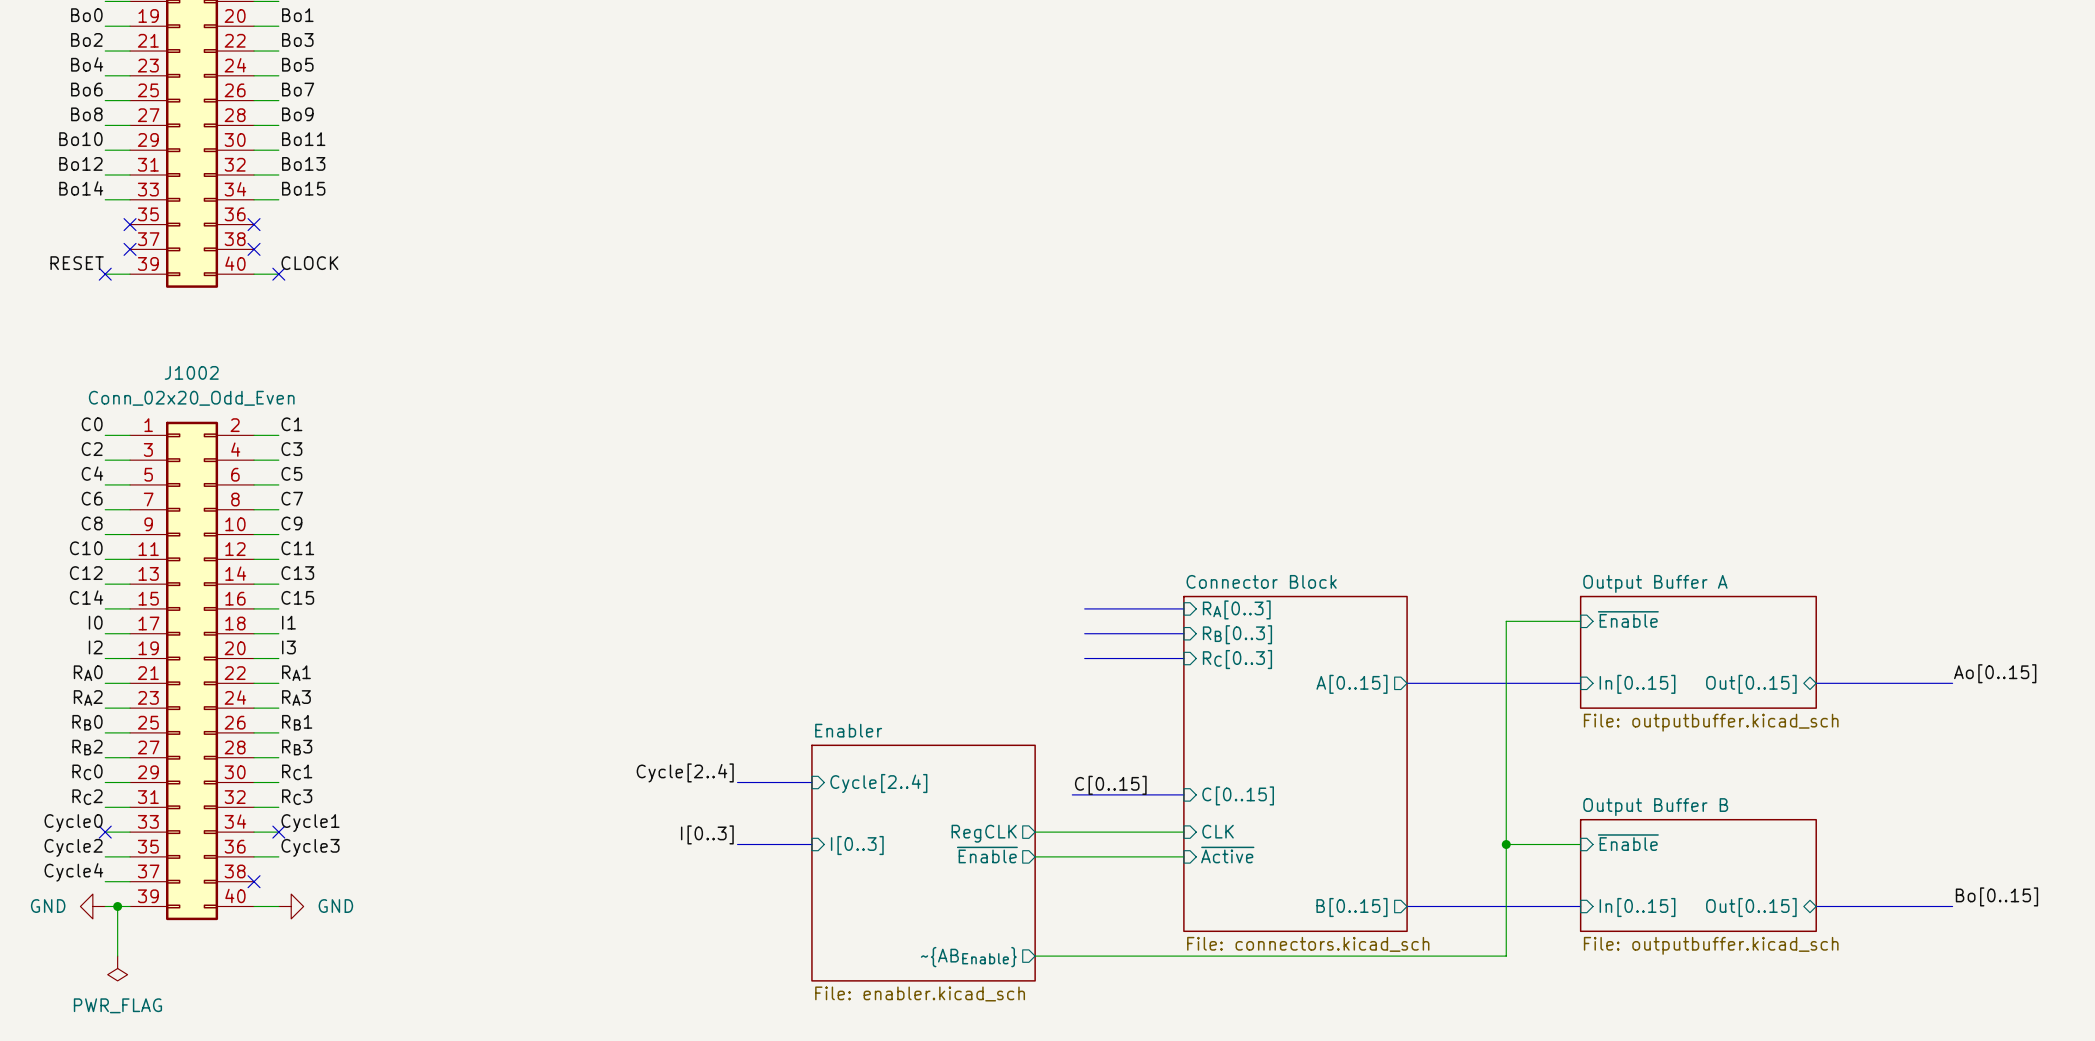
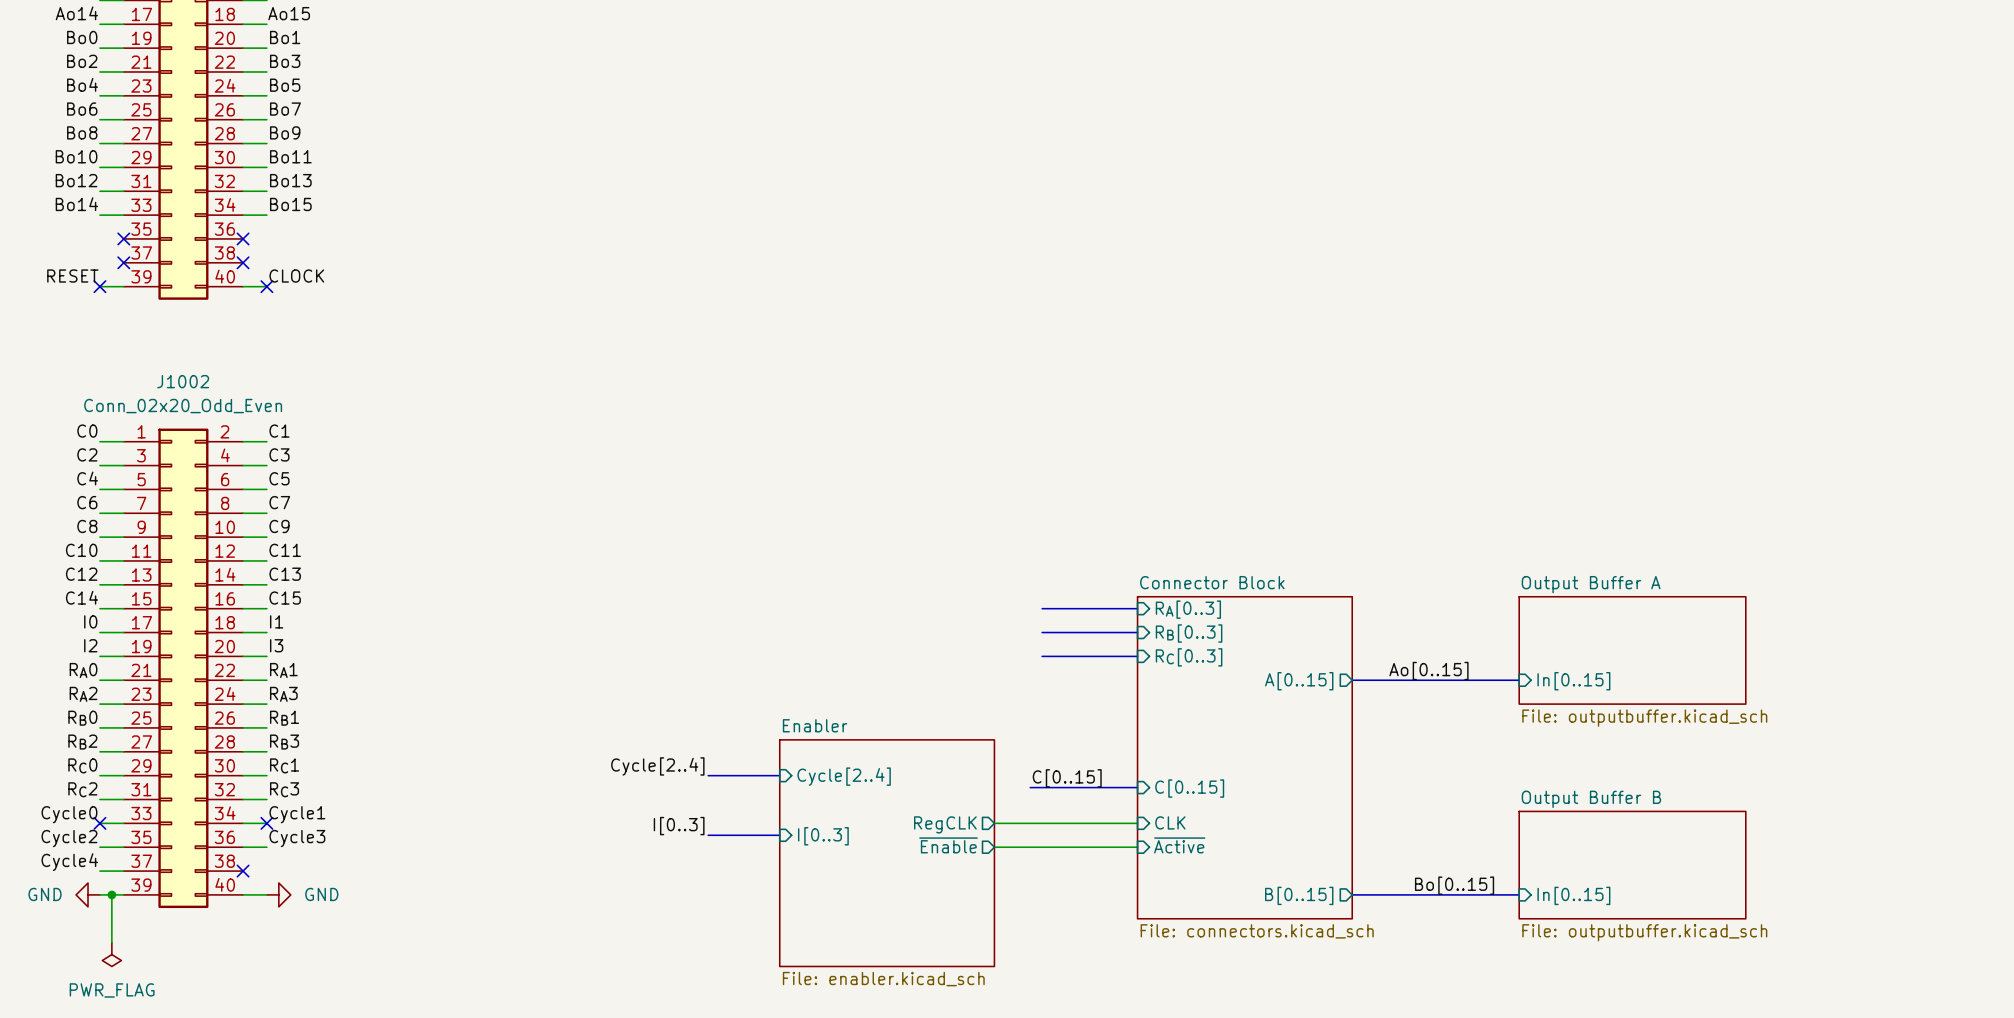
sheet pin: ~{Enable} (1628, 619) -> none
wire: (1580, 621) (1506, 621) (1506, 956) (1035, 956) -> none
label: none -> Ao[0..15] (1428, 671)
label: Ao[0..15] (1995, 673) -> none
bus: (1816, 683) (1952, 683) -> none
sheet pin: Out[0..15] (1751, 684) -> none
sheet pin: ~{Enable} (1628, 842) -> none
wire: (1506, 844) (1580, 844) -> none
junction: (1506, 844) -> none
label: none -> Bo[0..15] (1454, 885)
label: Bo[0..15] (1996, 896) -> none
bus: (1816, 906) (1952, 906) -> none
sheet pin: Out[0..15] (1751, 907) -> none
sheet pin: ~{ABEnable} (968, 957) -> none

